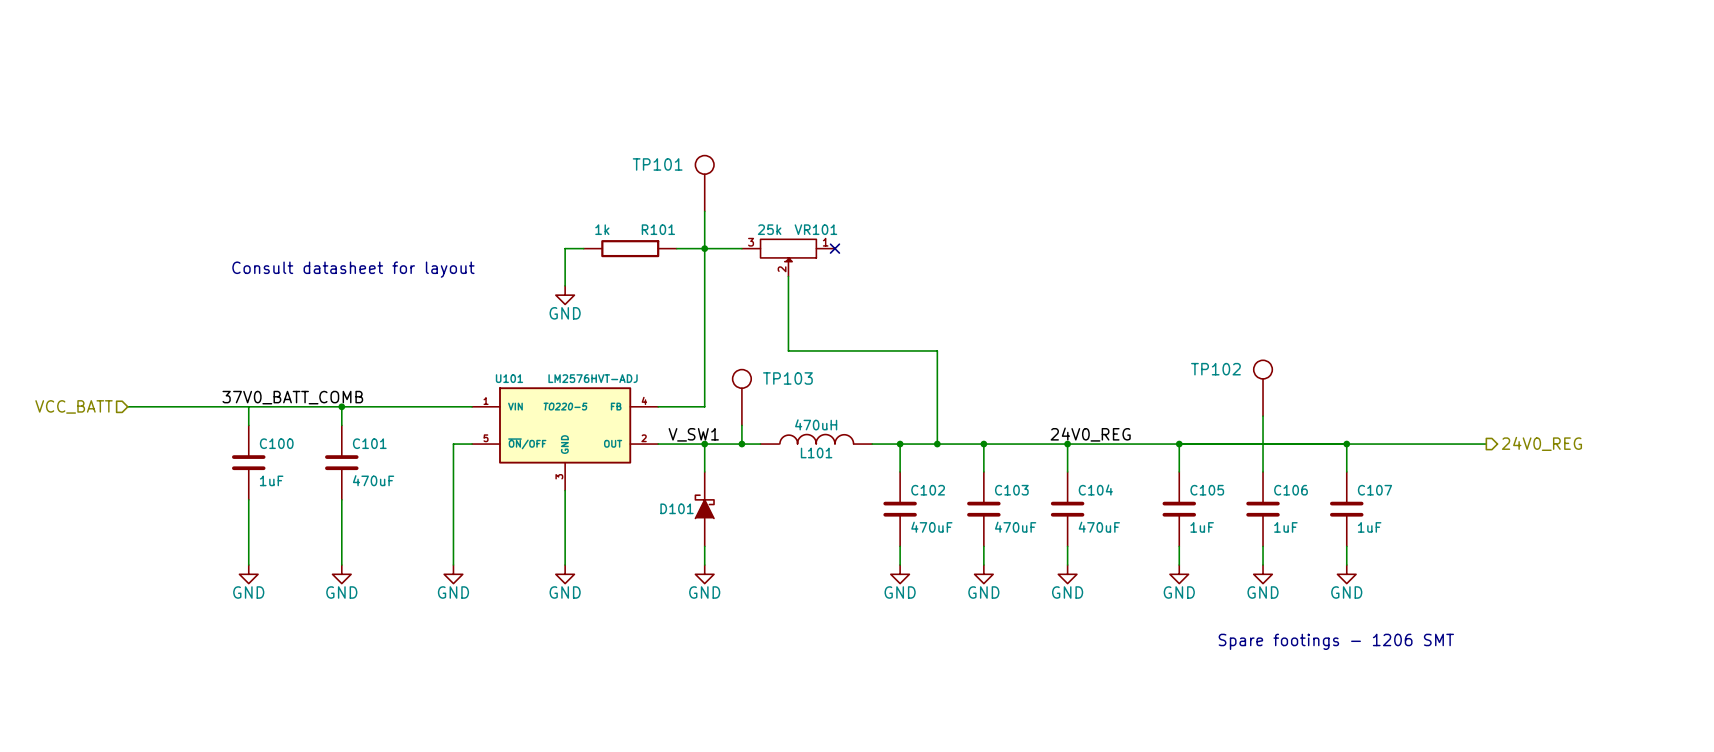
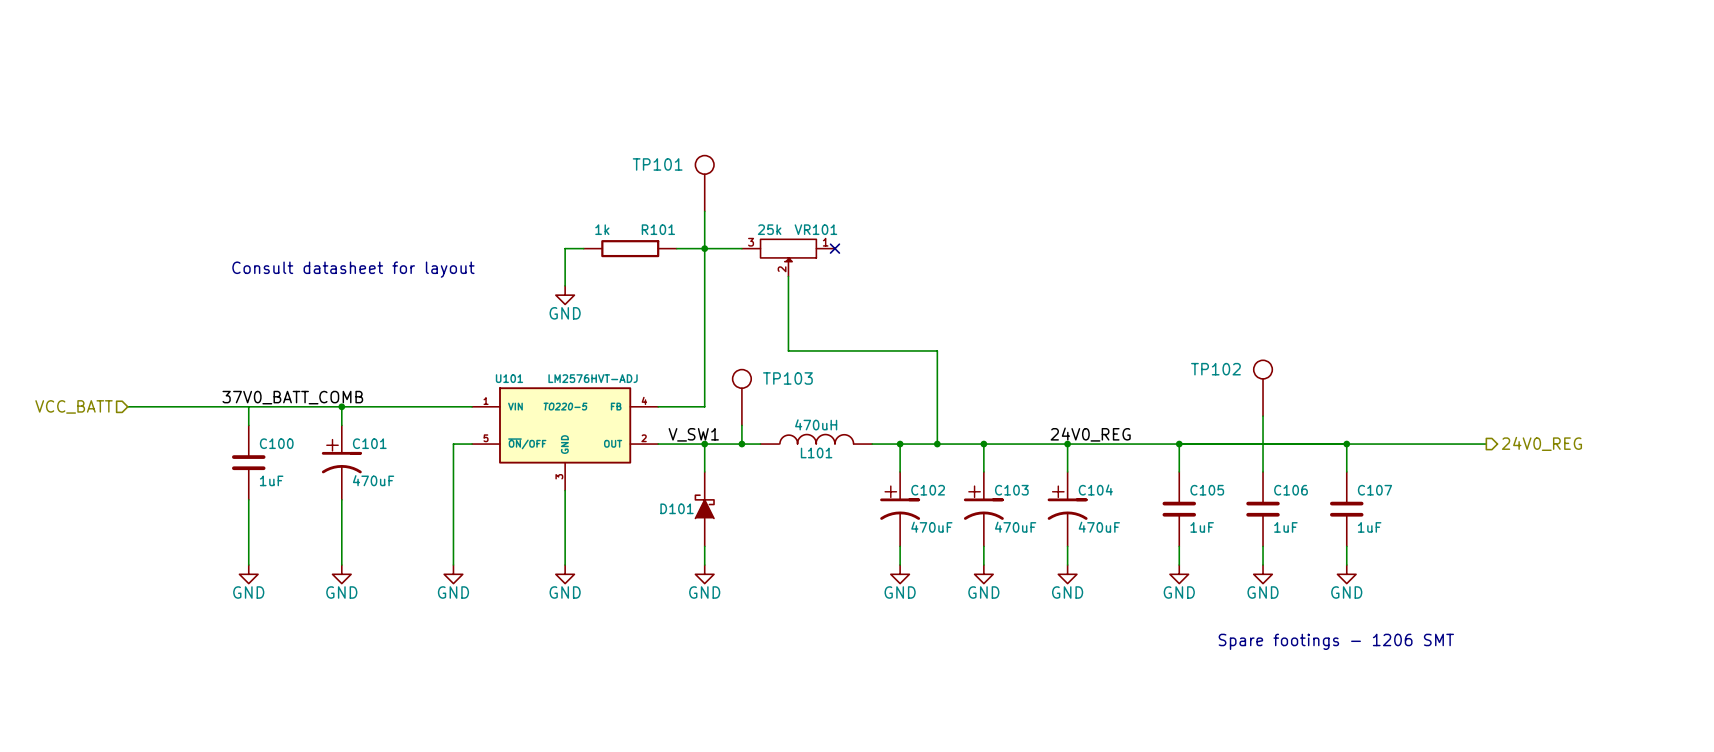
C101 symbol: [325, 425, 359, 500] -> [321, 425, 362, 500]
C102 symbol: [883, 471, 917, 547] -> [880, 471, 921, 547]
C103 symbol: [967, 471, 1001, 547] -> [963, 471, 1004, 547]
C104 symbol: [1050, 471, 1085, 547] -> [1047, 471, 1088, 547]

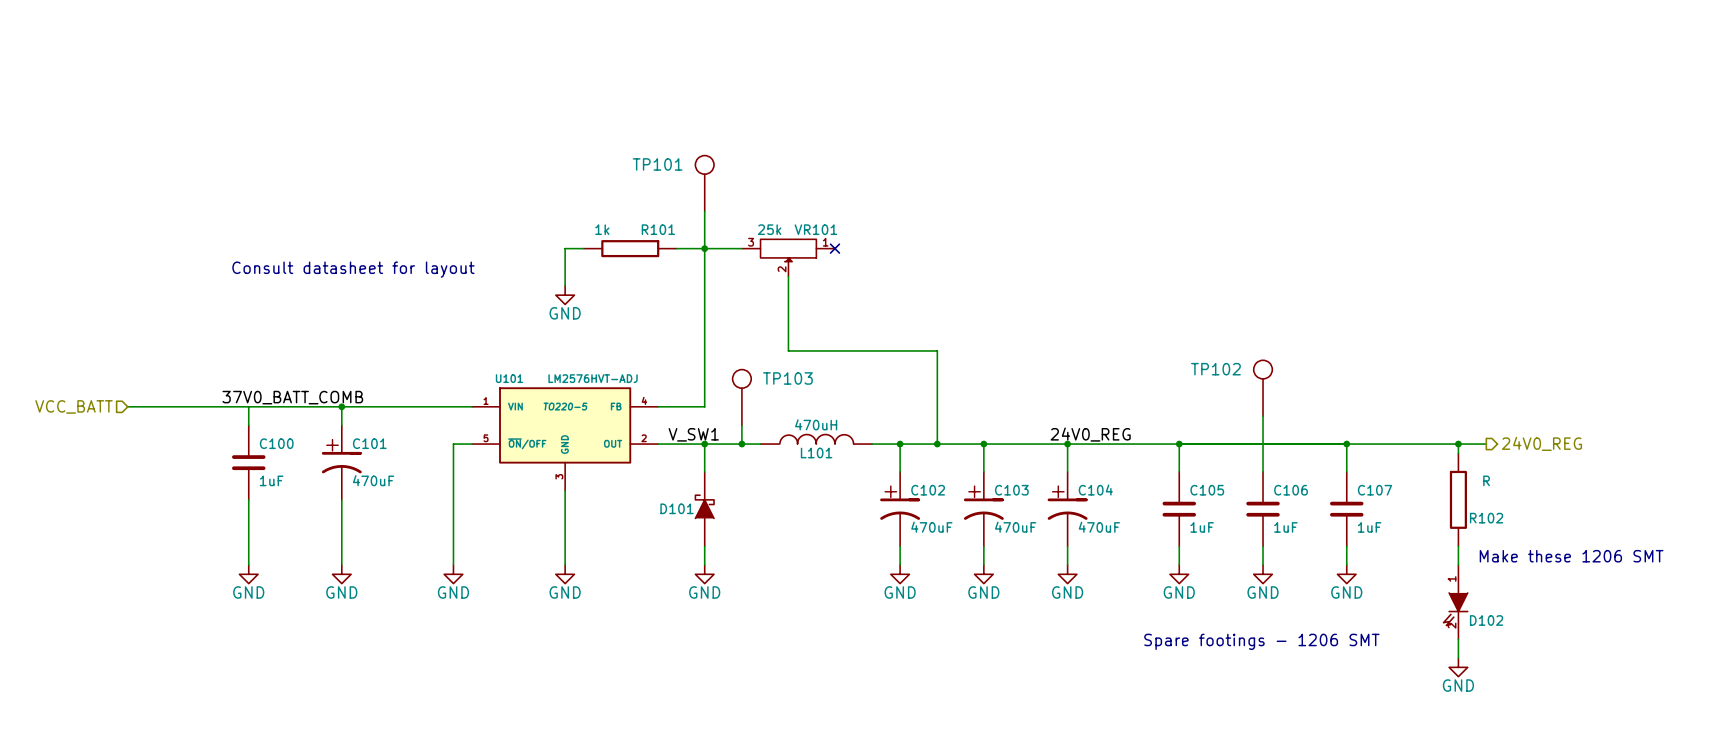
wire: none -> (1458, 444) (1458, 453)
junction: none -> (1458, 444)
R102: none -> R (1458, 499)
wire: none -> (1458, 546) (1458, 565)
text: none -> Make these 1206 SMT (1571, 556)
D102: none -> (1455, 602)
wire: none -> (1458, 639) (1458, 658)
text position: Spare footings - 1206 SMT (1336, 641) -> Spare footings - 1206 SMT (1261, 641)
power symbol: none -> GND (1458, 667)

